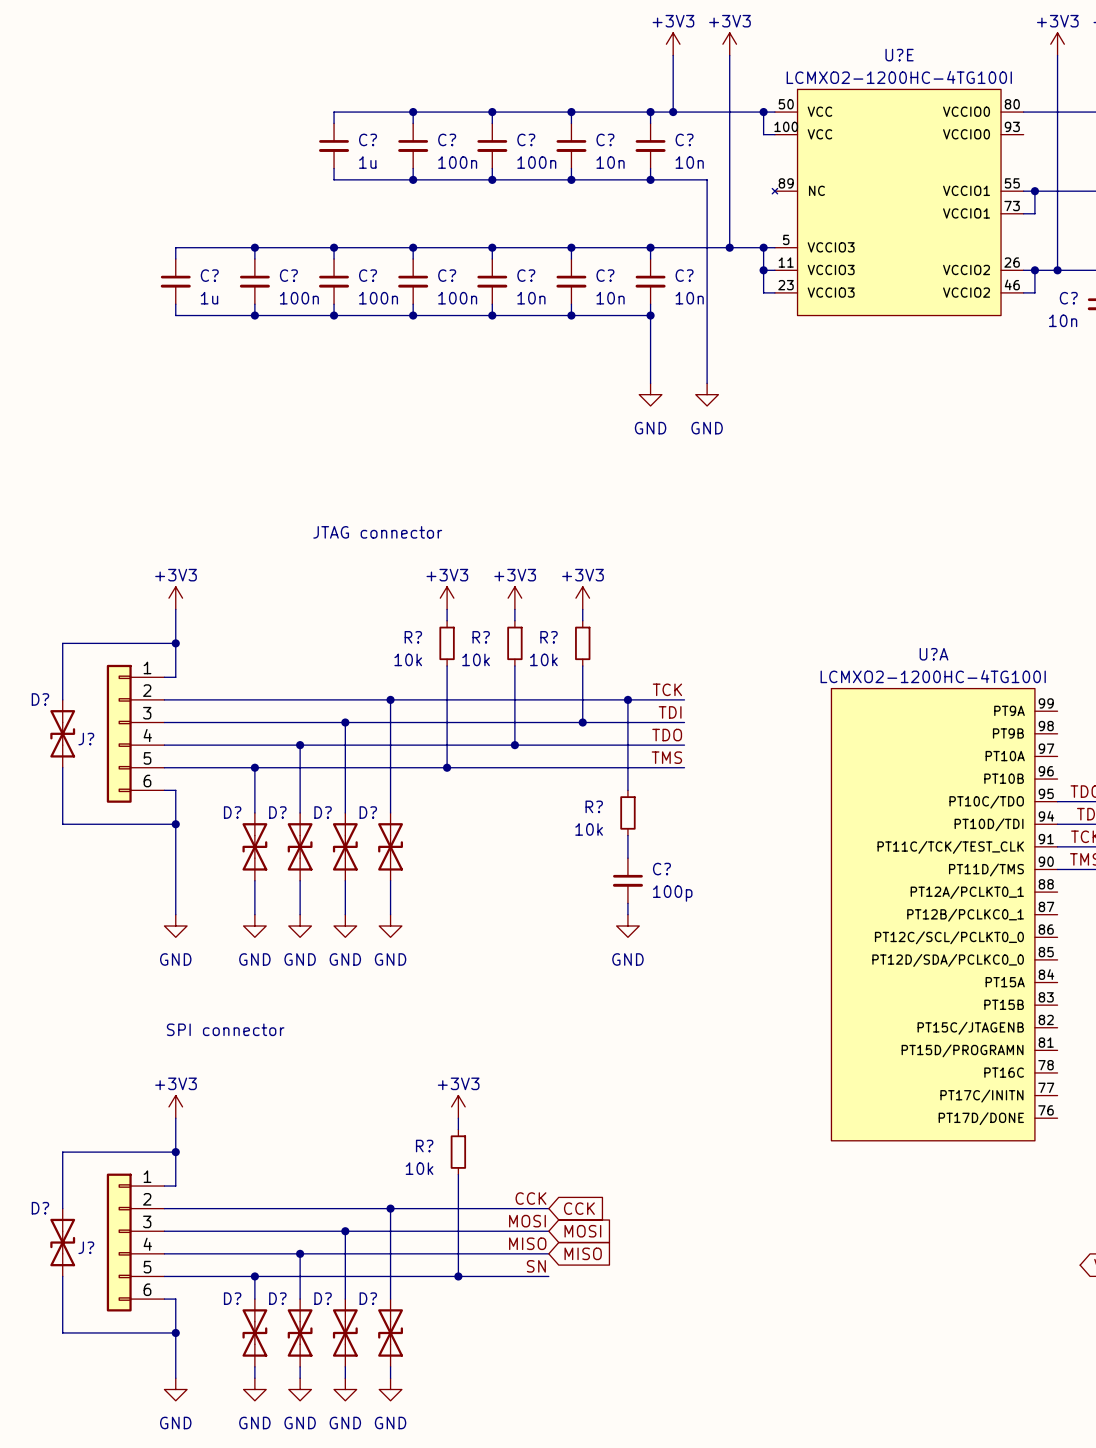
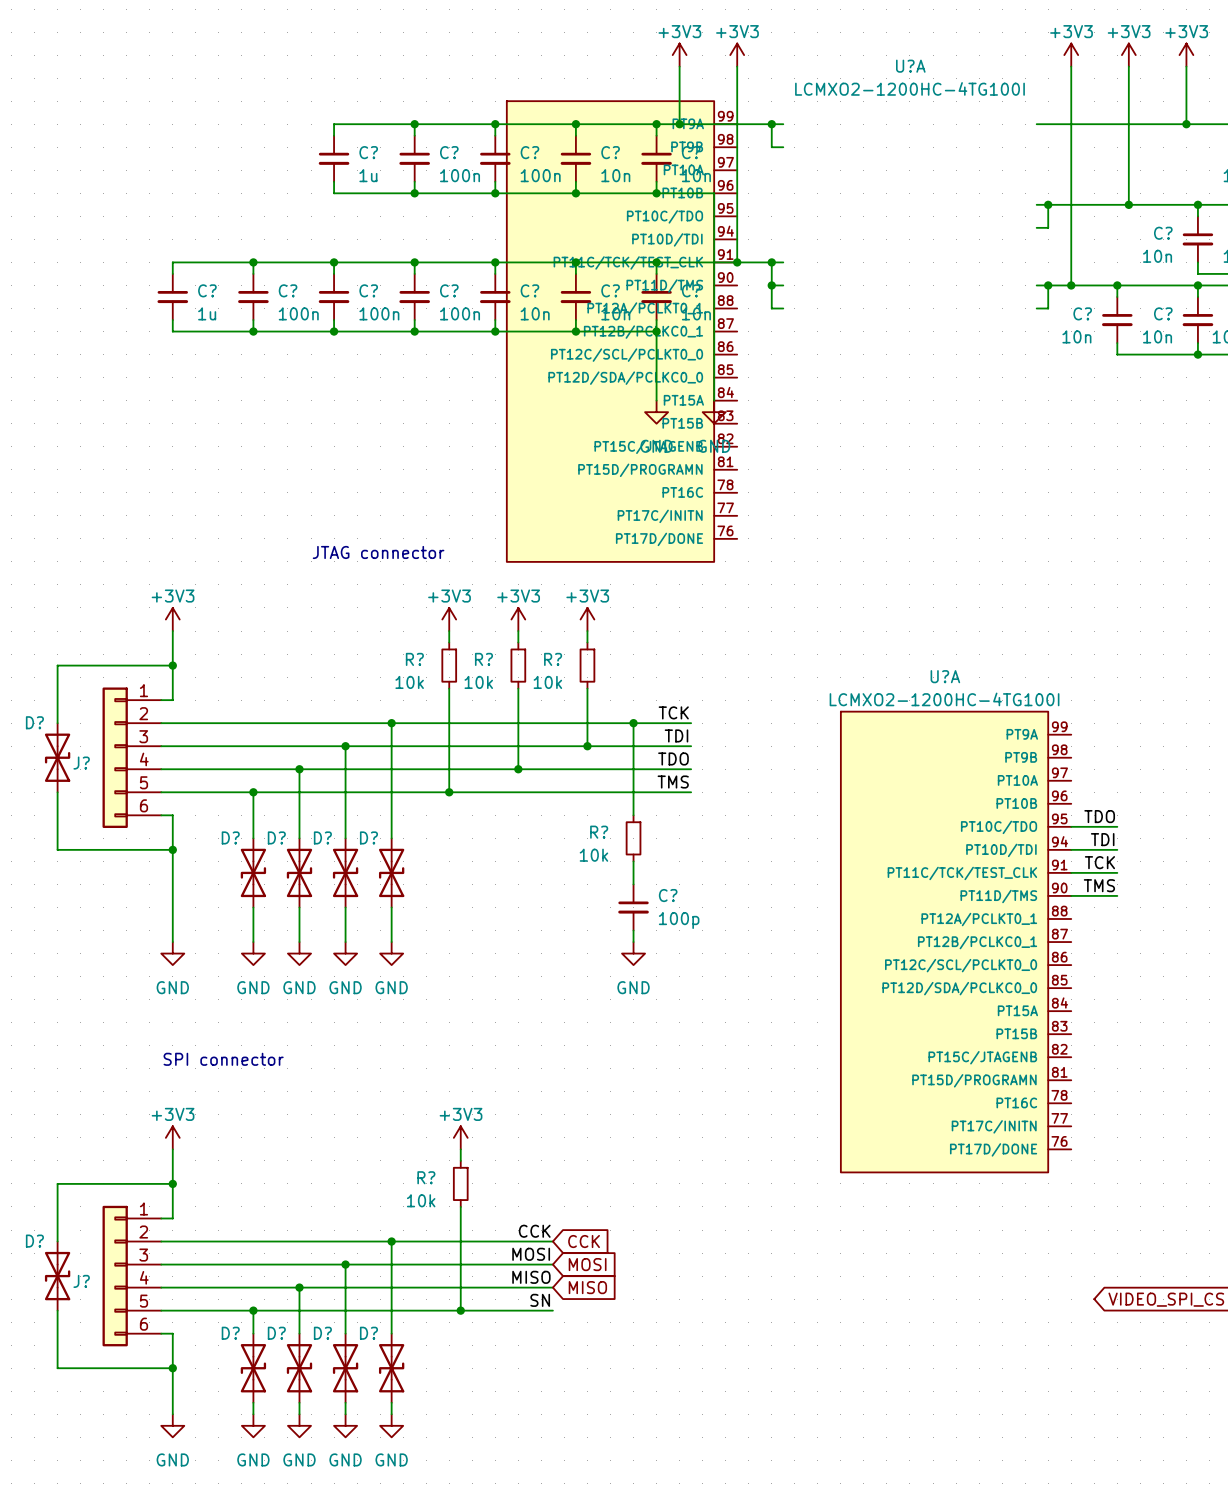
U?E: LCMXO2-1200HC-4TG100I (897, 202) -> none
U?A: none -> LCMXO2-1200HC-4TG100I (622, 331)

